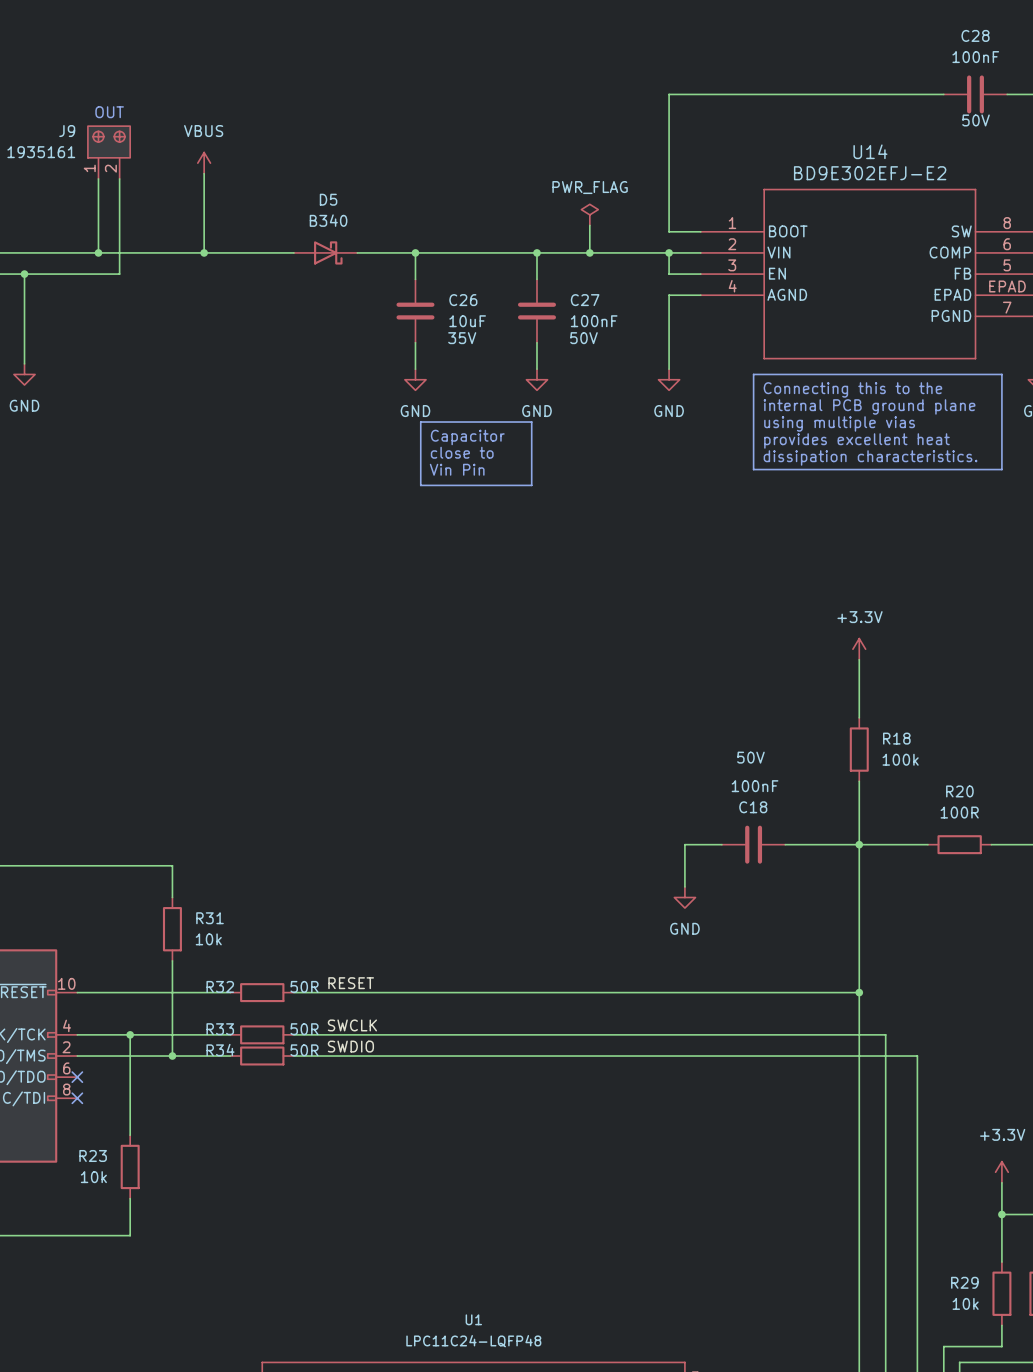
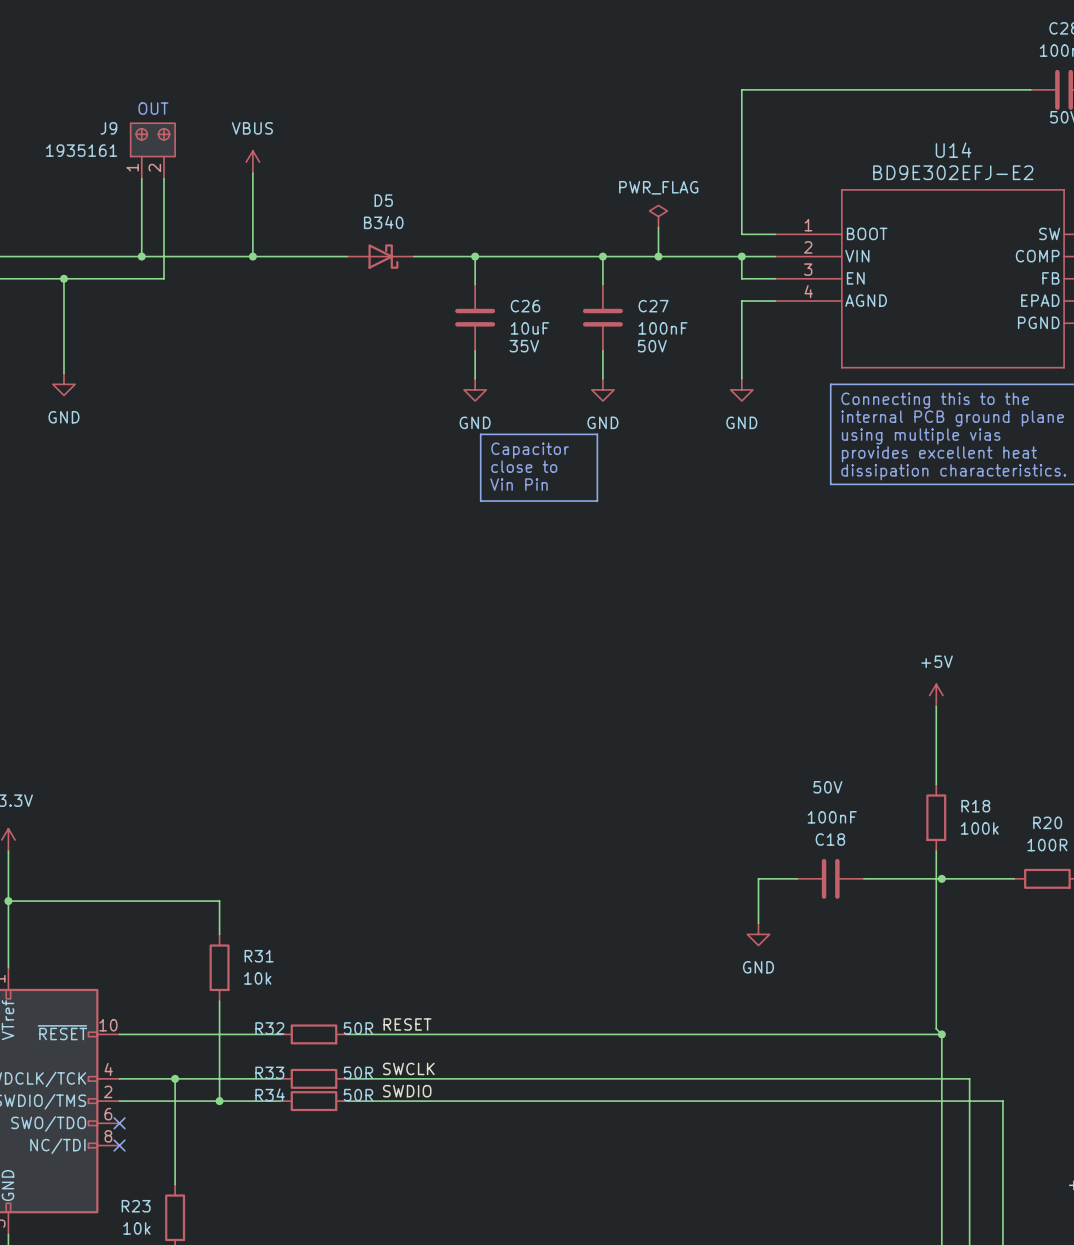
power symbol: +3.3V (859, 649) -> none
wire: (859, 659) (859, 717) -> none
power symbol: none -> +5V (936, 695)
wire: none -> (936, 706) (936, 784)
R18 position: (859, 749) -> (936, 817)
wire: (859, 781) (859, 992) -> (936, 851) (936, 1028) (941, 1034)

